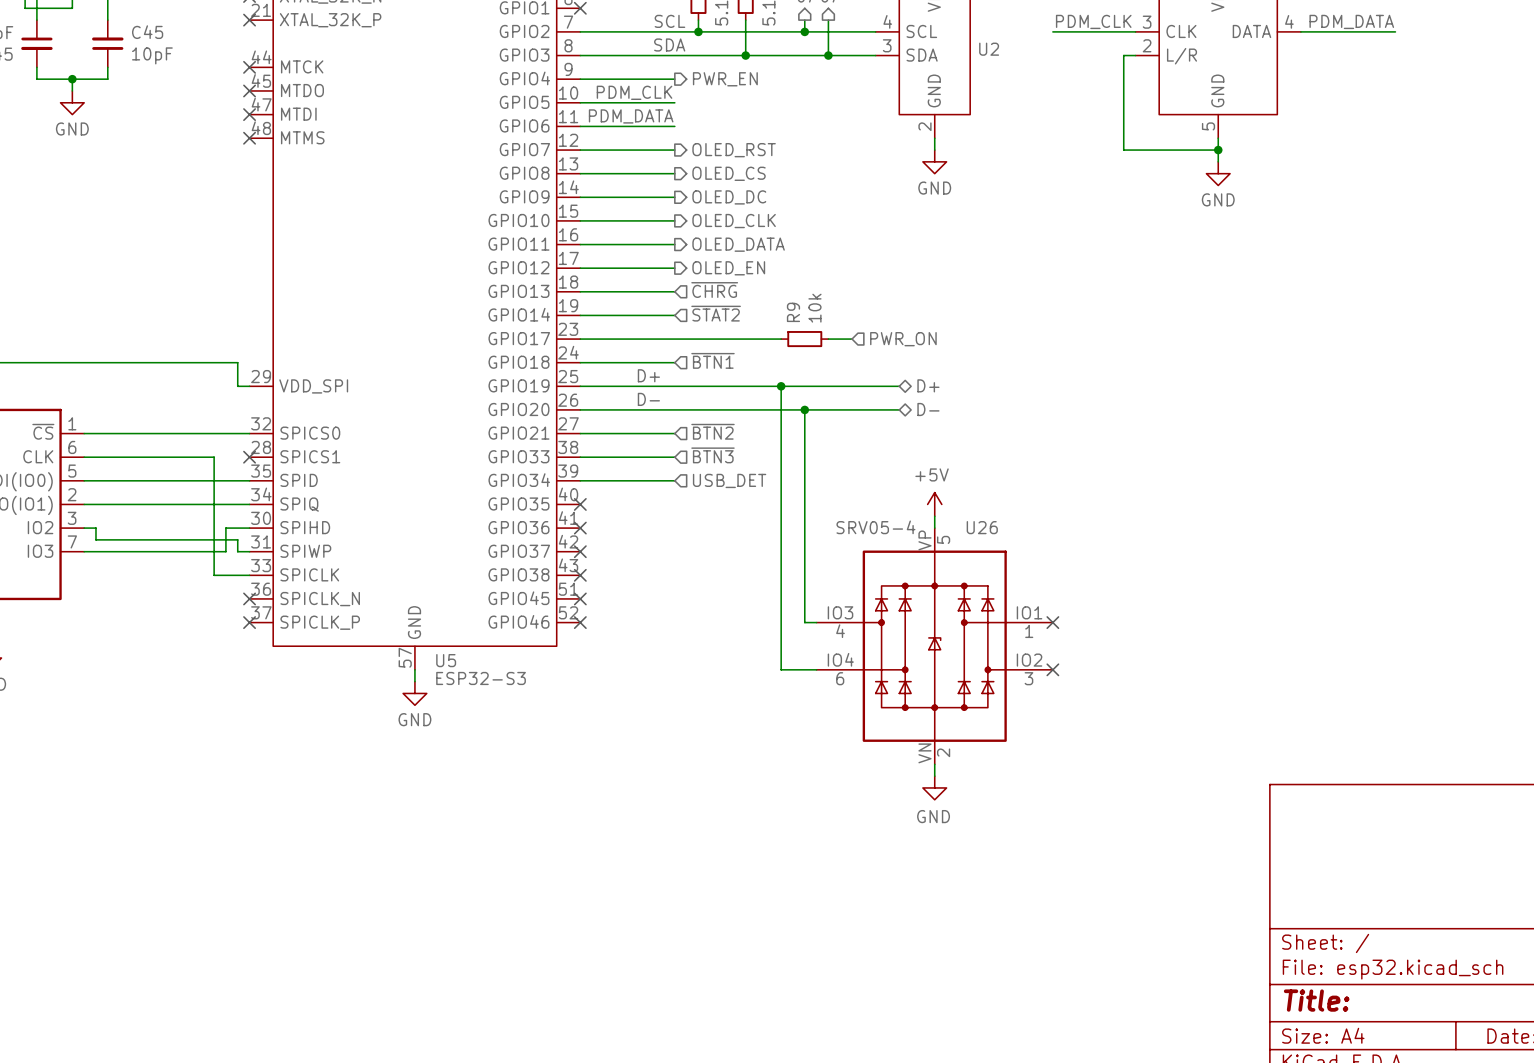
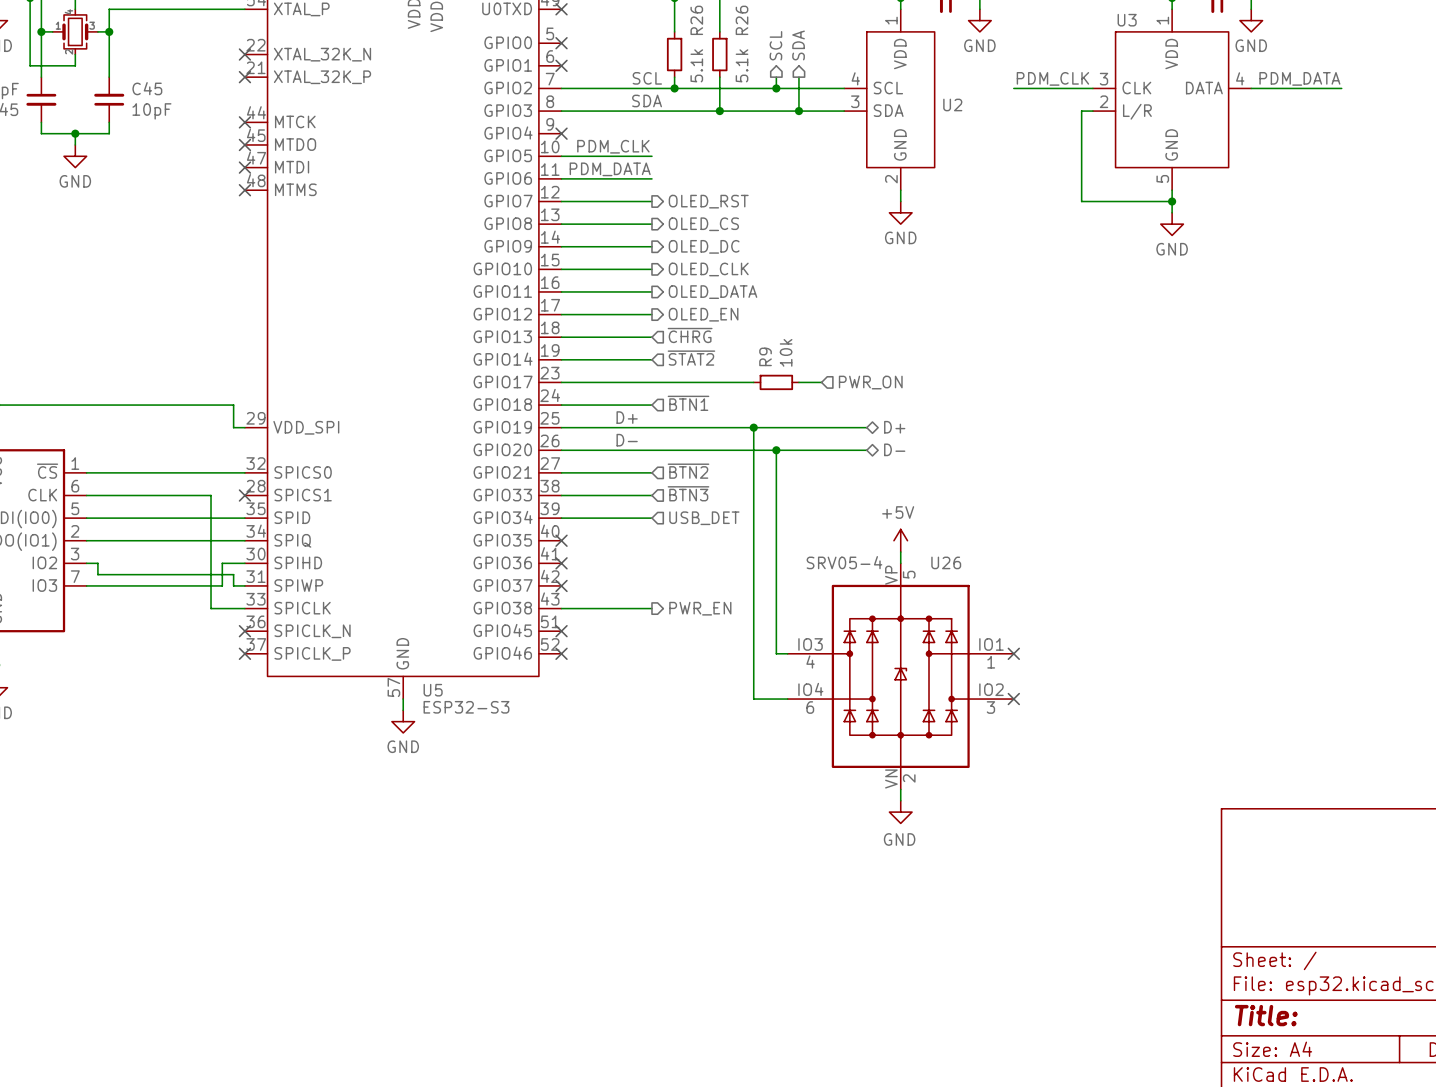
wire: (580, 79) (674, 79) -> none
no-connect mark: none -> (561, 133)
hierarchical label: PWR_EN (725, 79) -> none
wire: none -> (561, 608) (651, 608)
no-connect mark: (580, 575) -> none
hierarchical label: none -> PWR_EN (700, 608)

